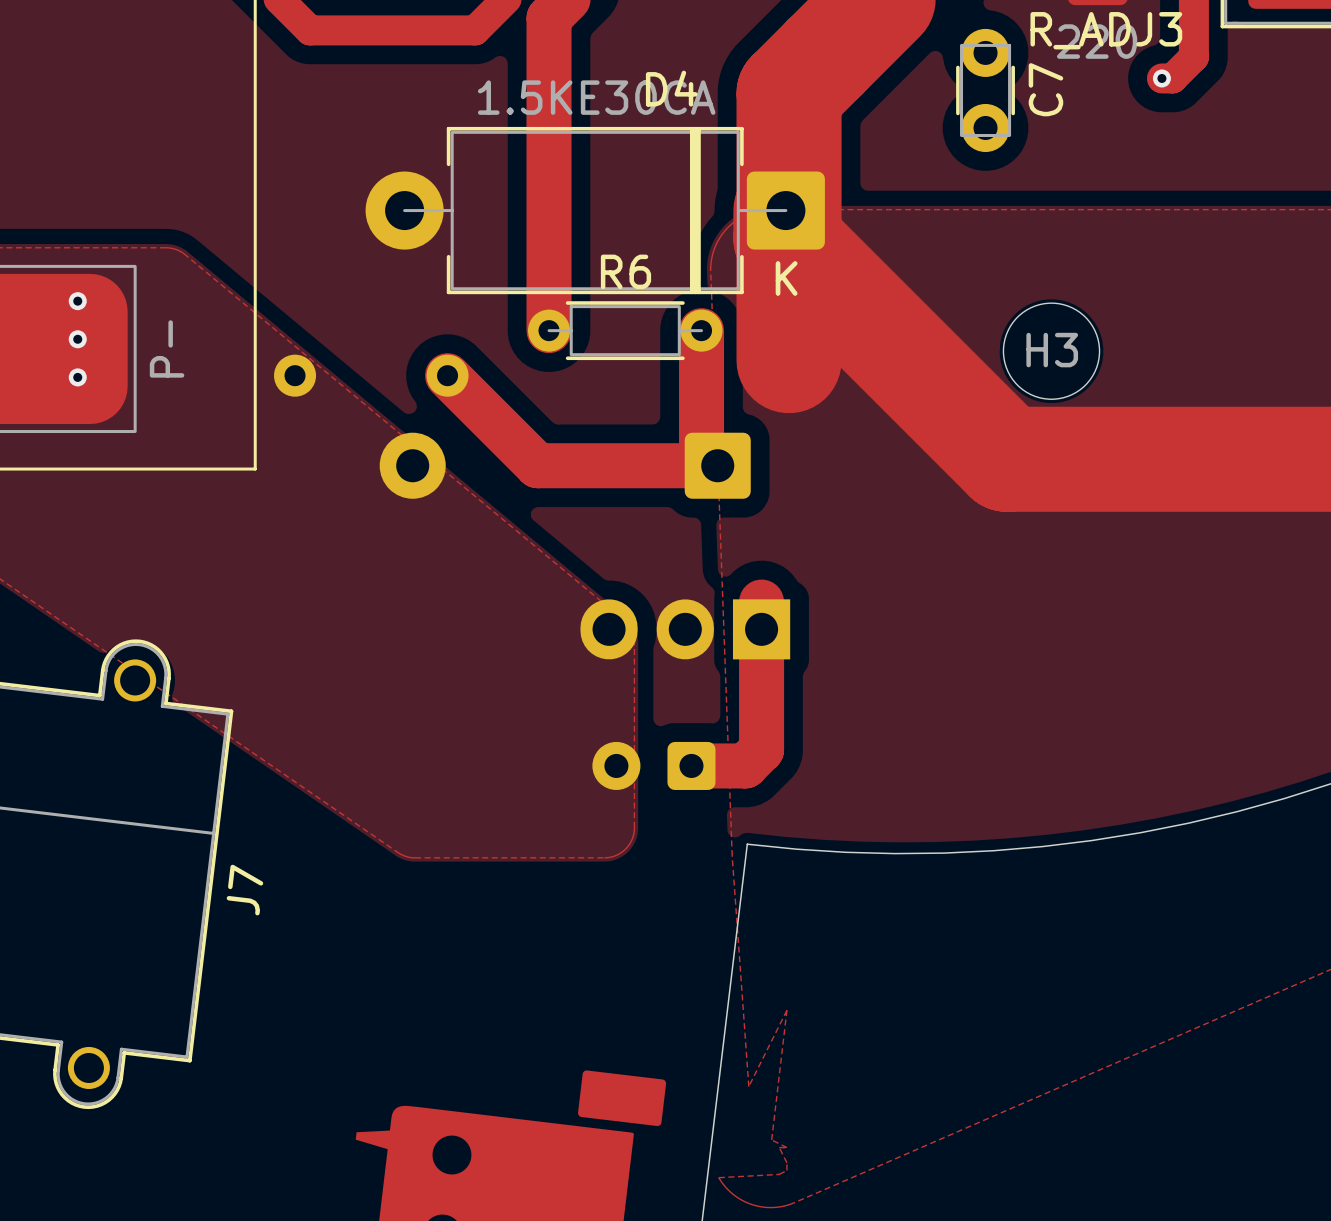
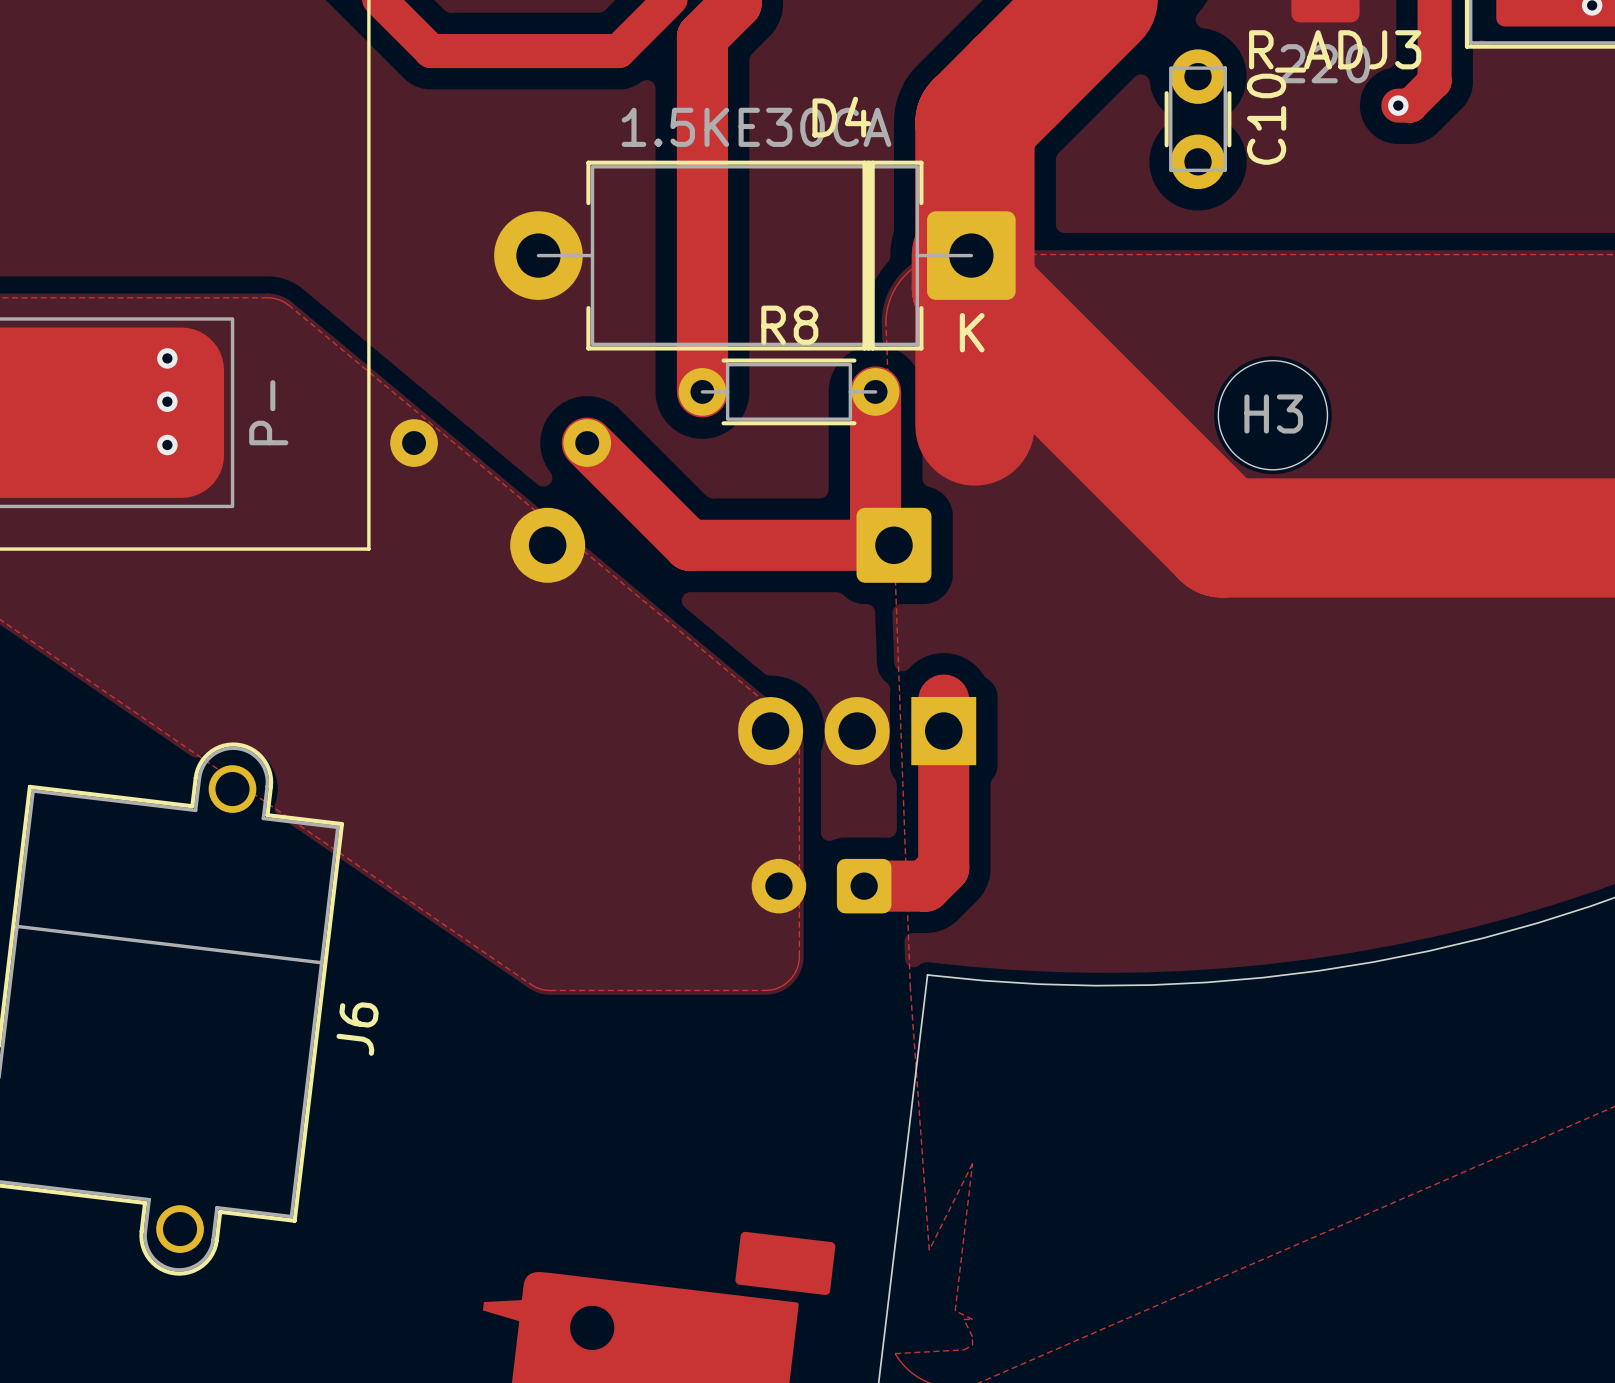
C7 name: C7 (1045, 89) -> C10 (1266, 119)
R6 name: R6 (625, 271) -> R8 (789, 325)
J7 name: J7 (244, 890) -> J6 (357, 1029)

